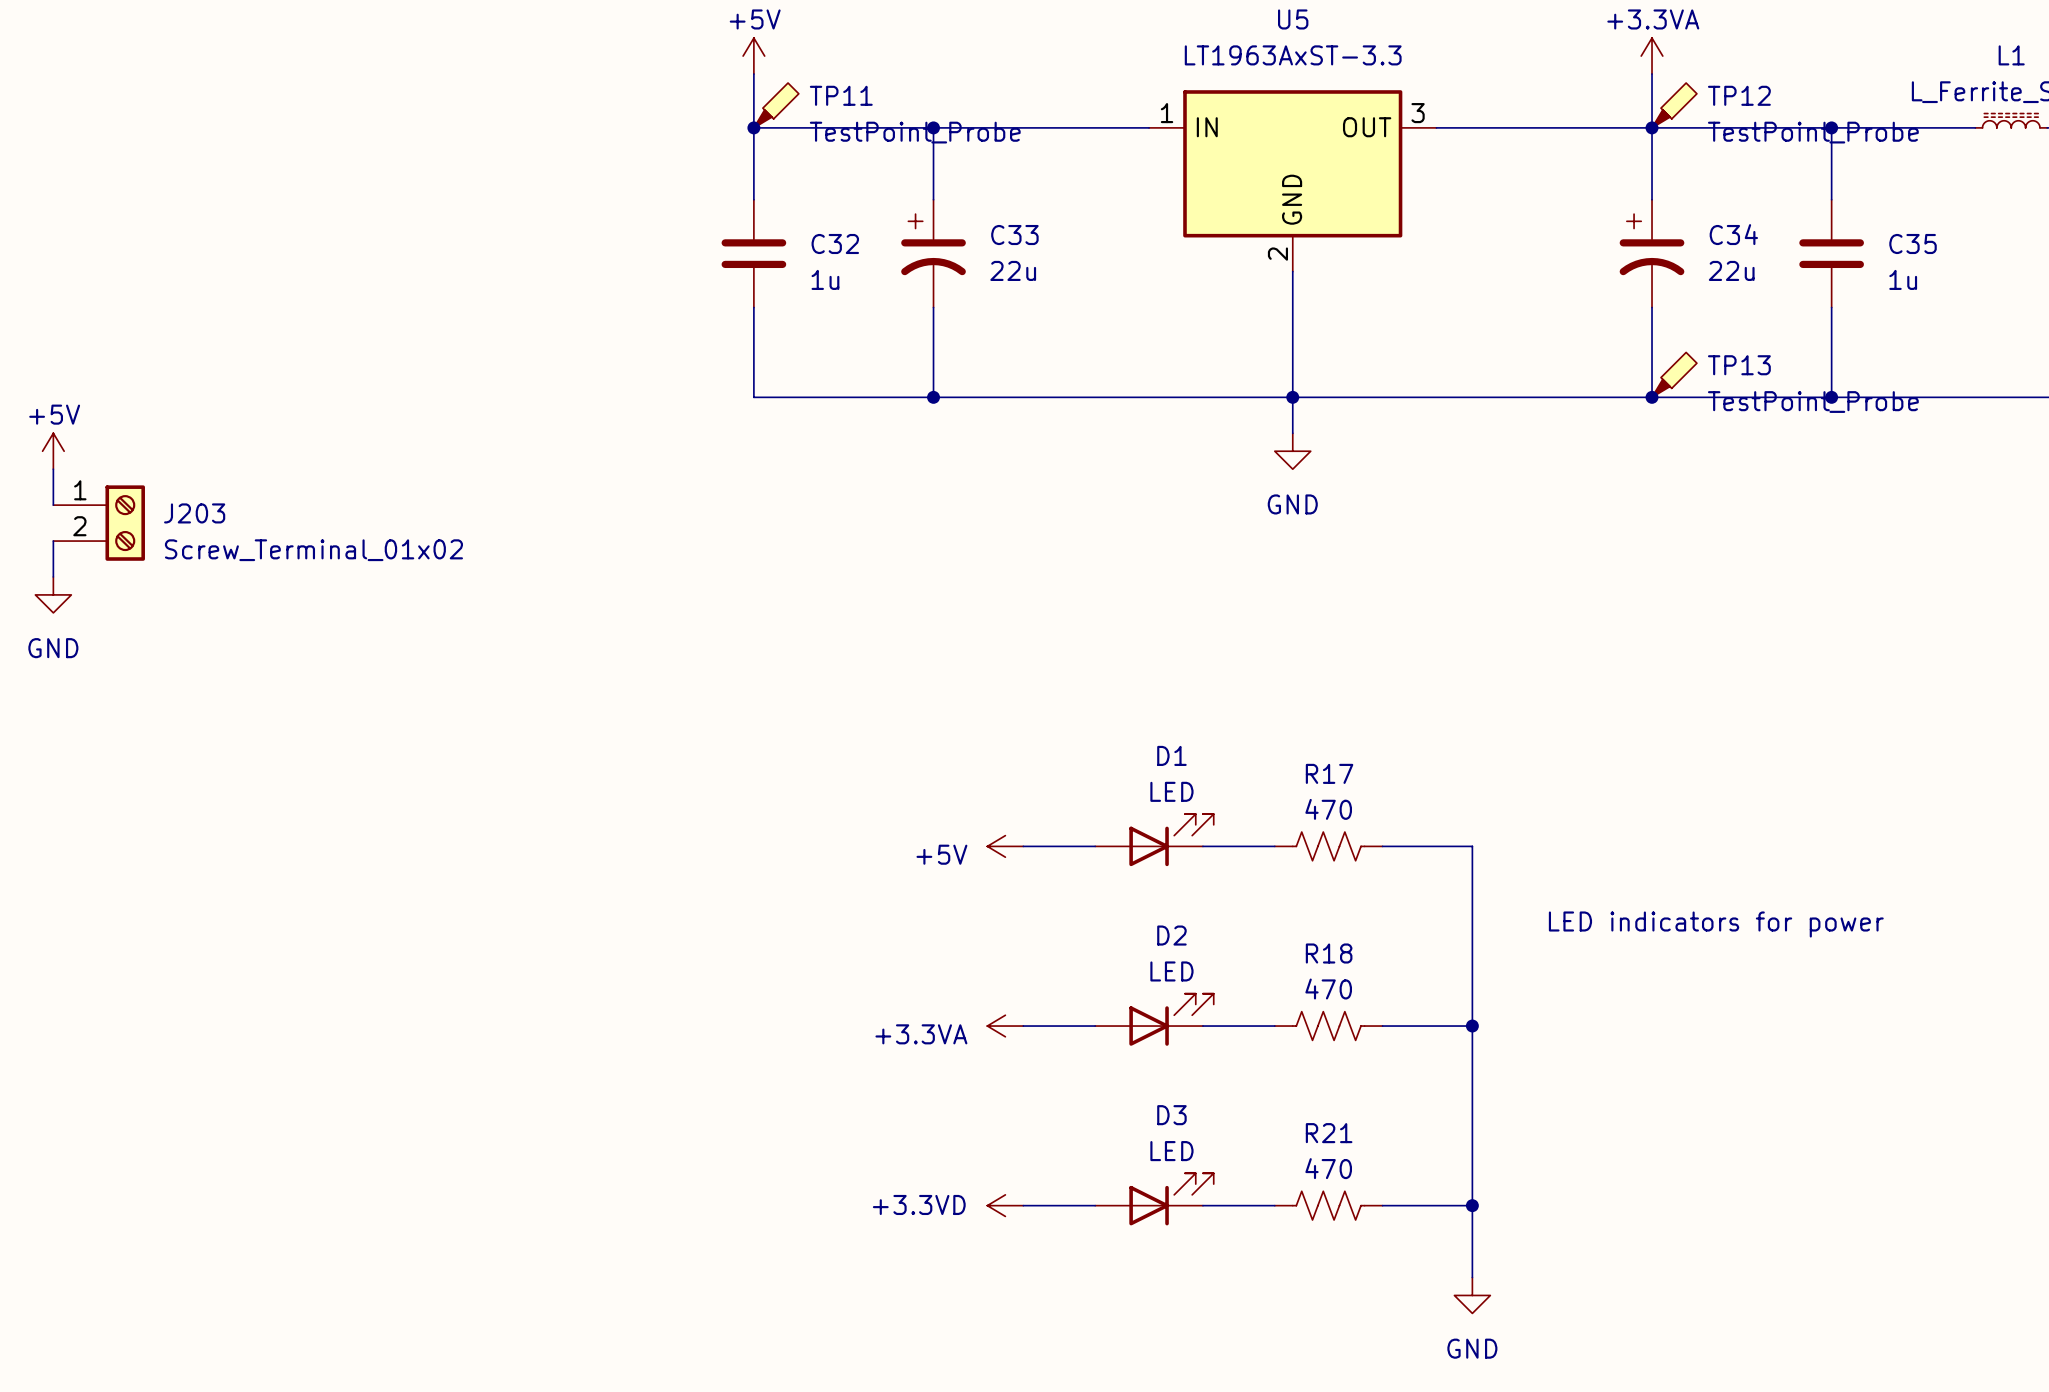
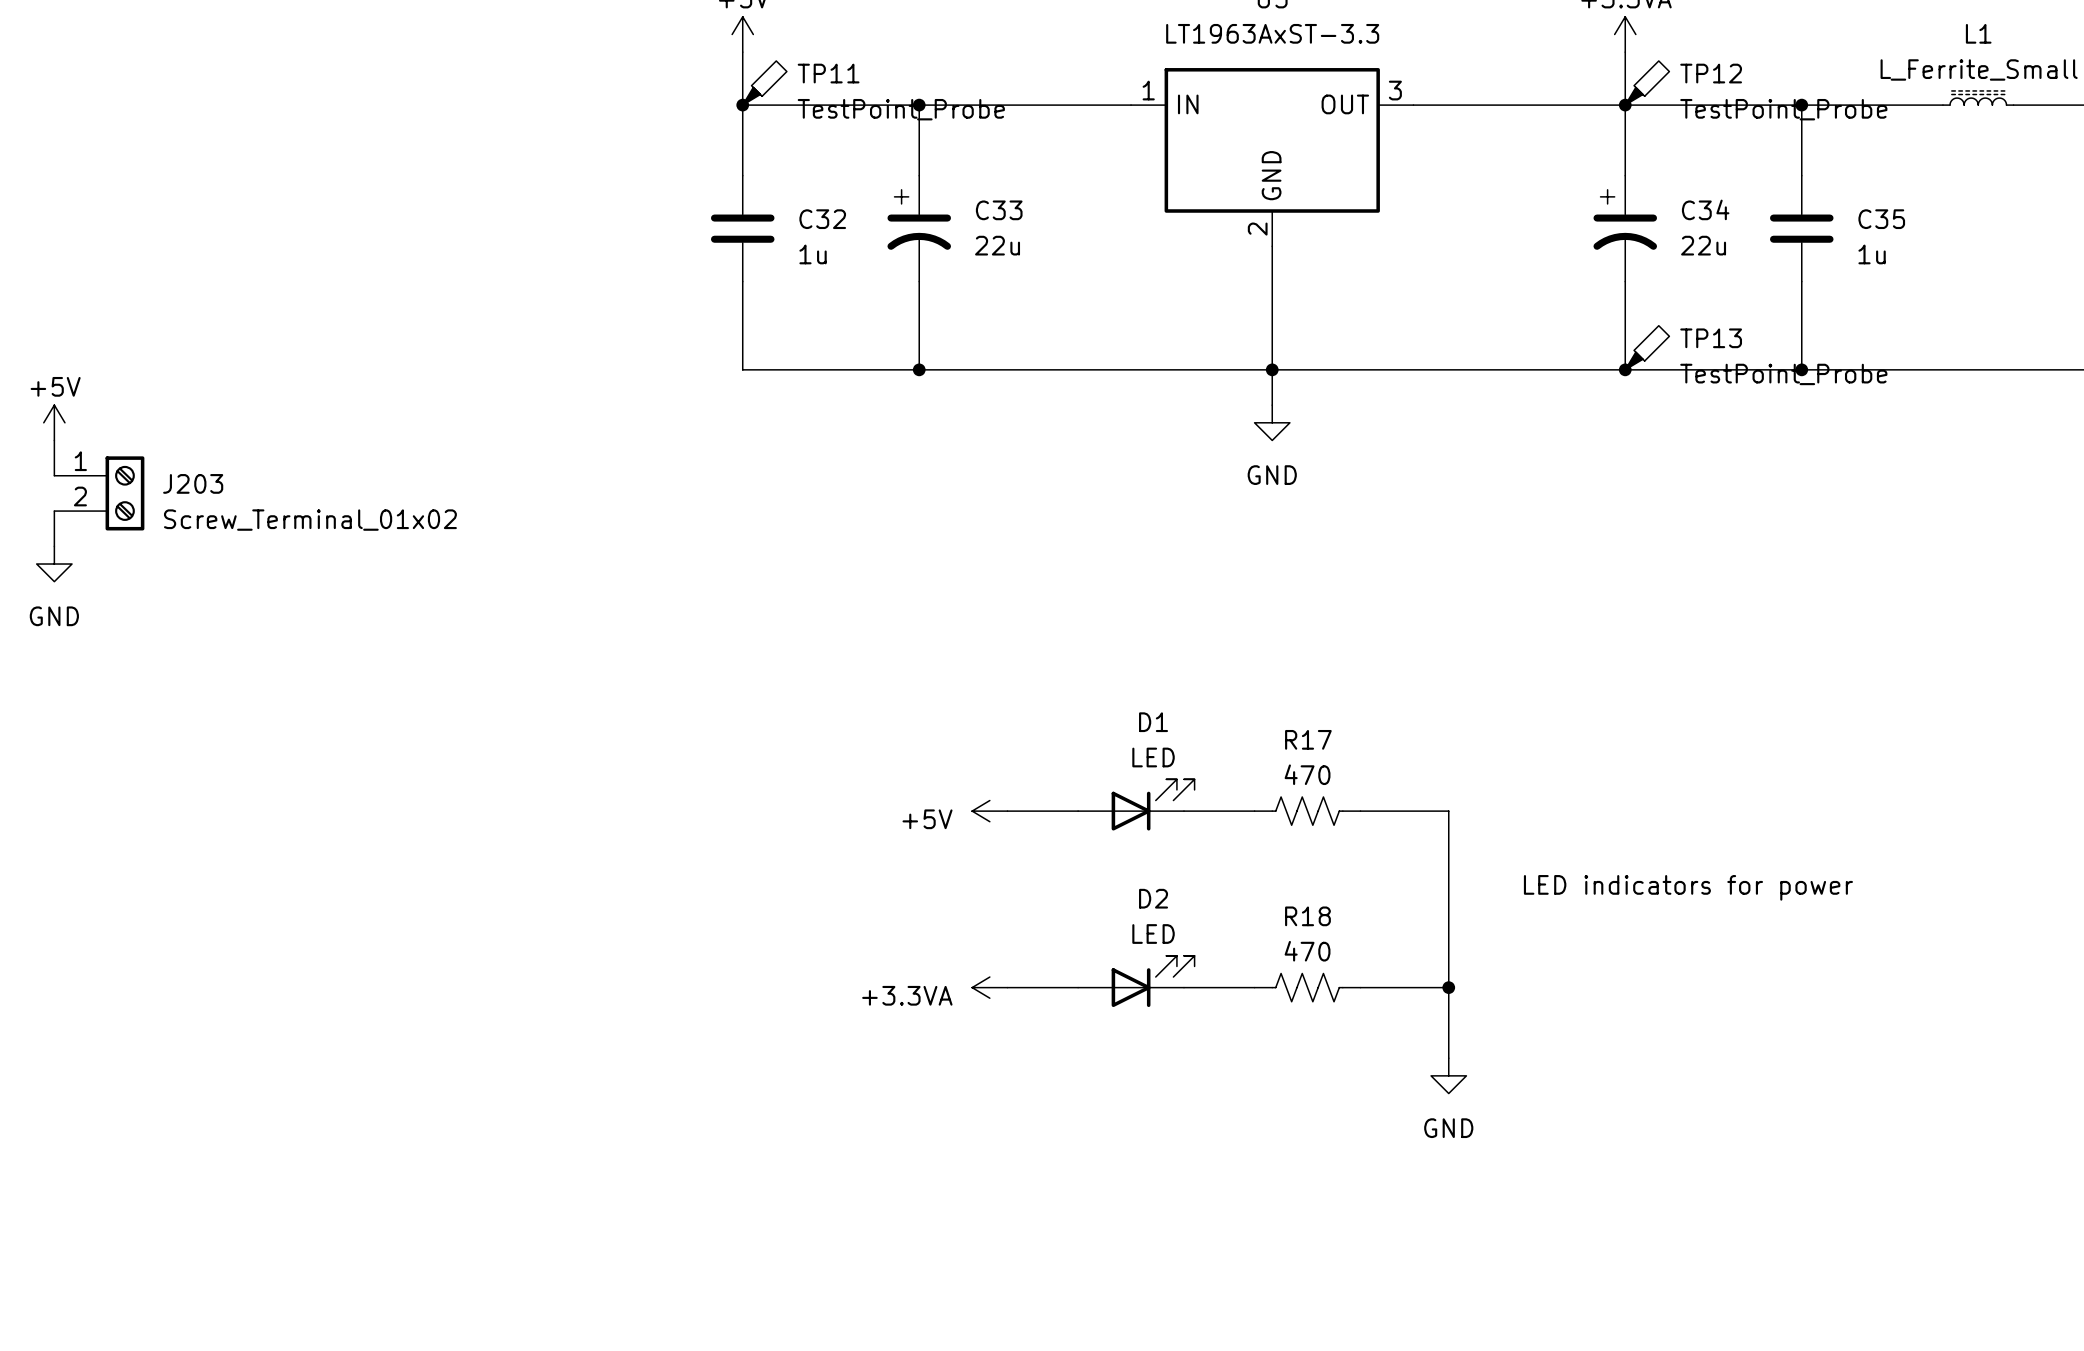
wire: (1472, 1097) (1472, 1277) -> none
D3: LED (1154, 1199) -> none
power symbol: +3.3VD (1005, 1205) -> none
wire: (1023, 1205) (1095, 1205) -> none
wire: (1202, 1205) (1274, 1205) -> none
R21: 470 (1328, 1205) -> none
wire: (1382, 1205) (1472, 1205) -> none
junction: (1472, 1205) -> none
power symbol position: GND (1472, 1295) -> GND (1448, 1075)

